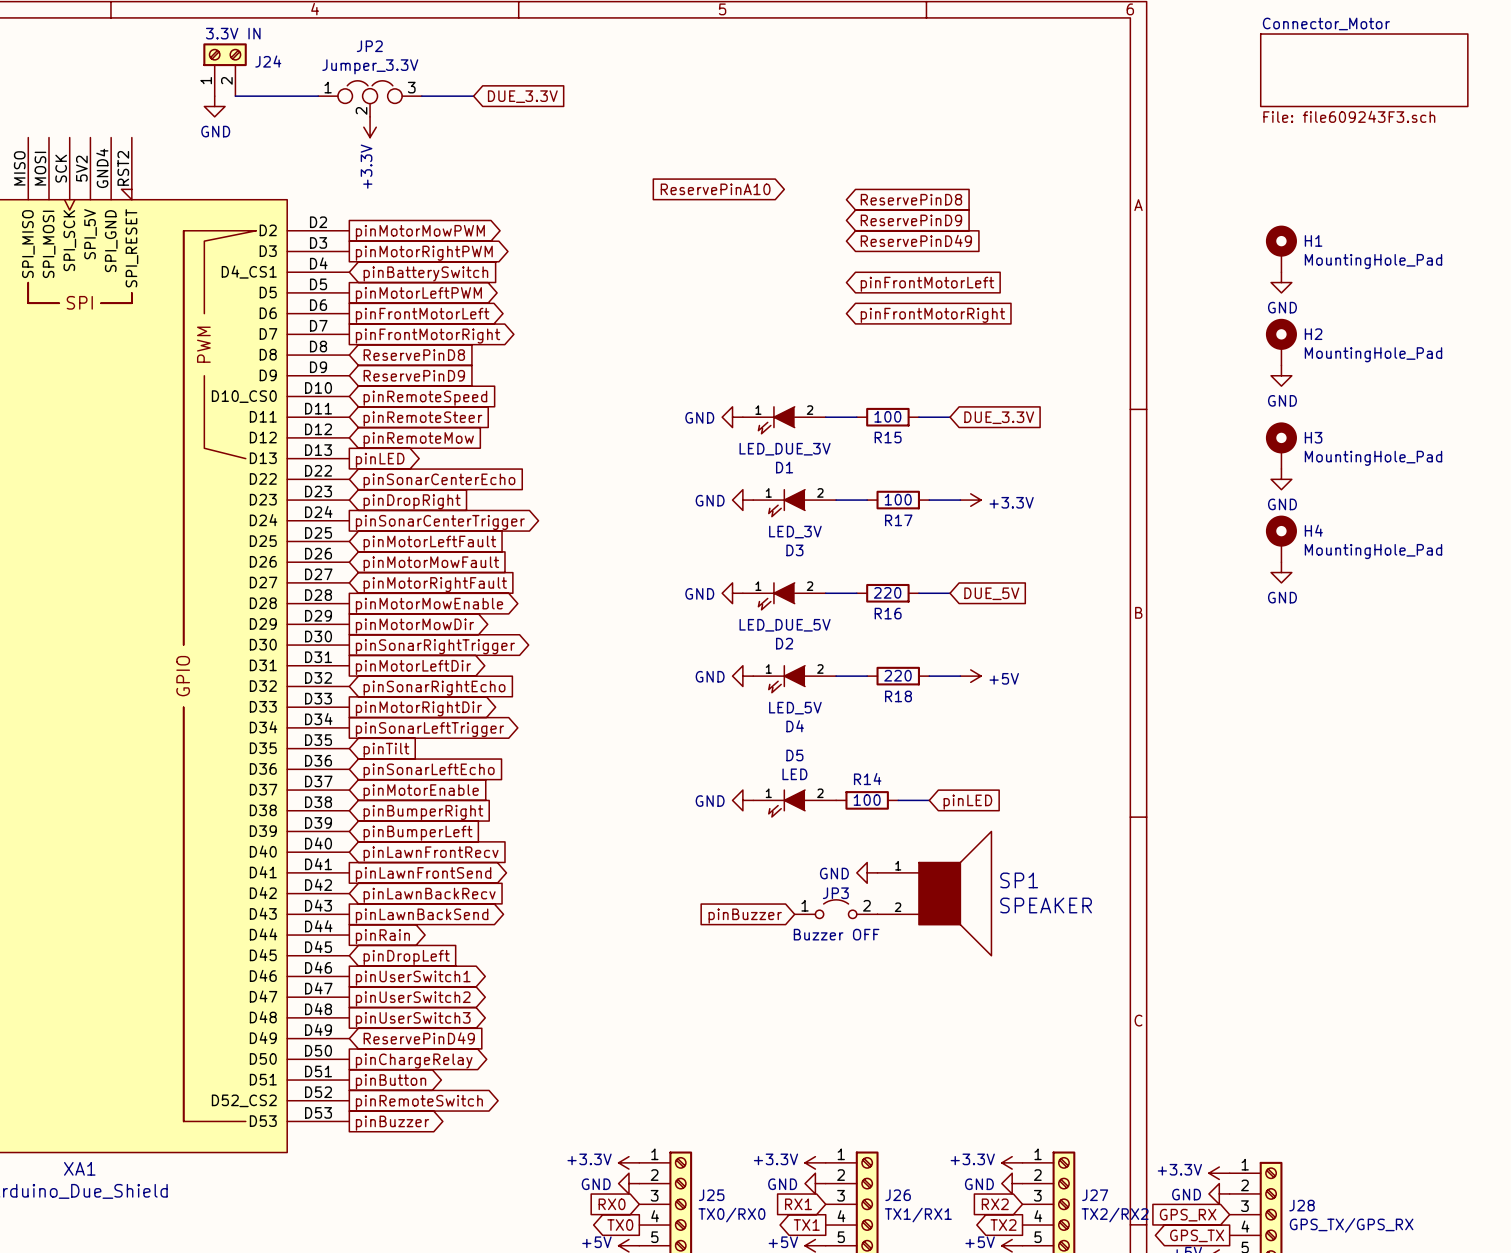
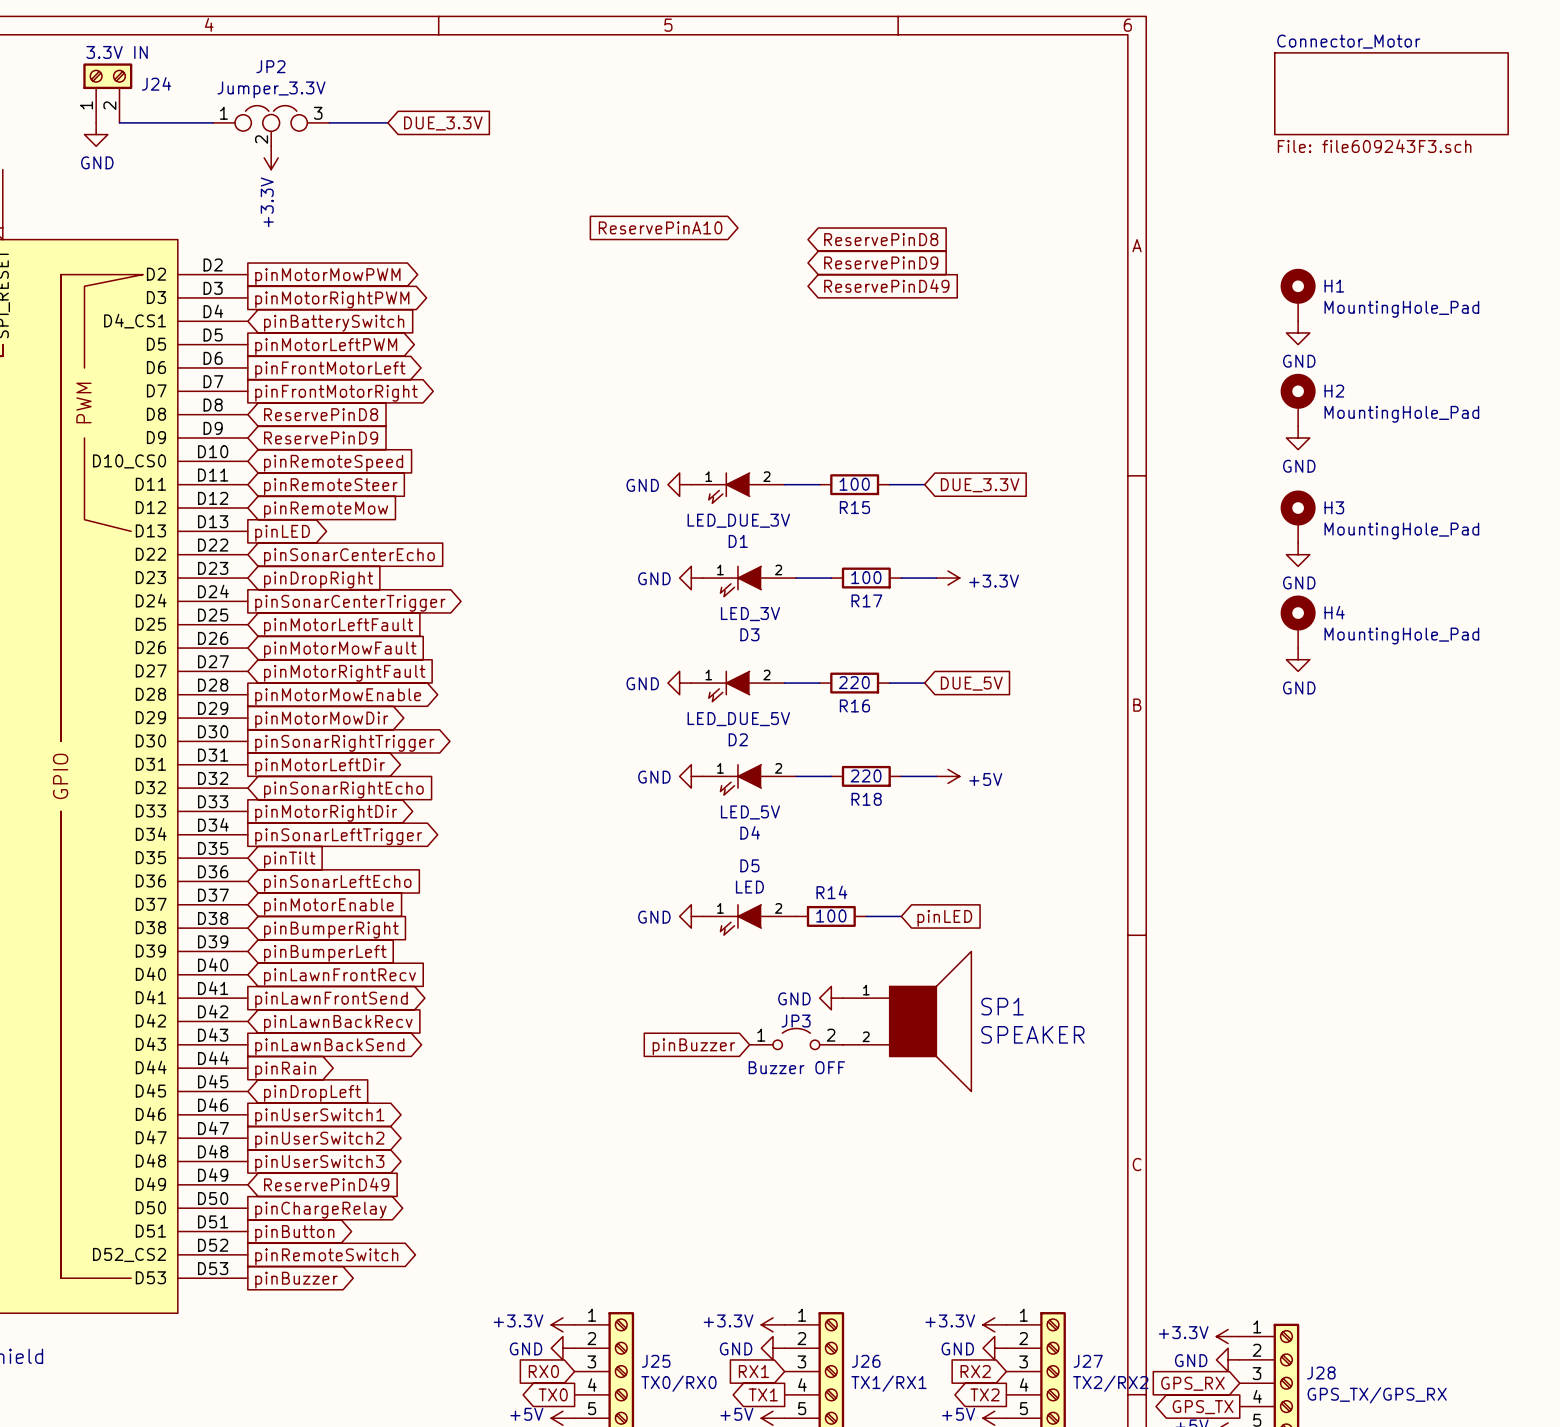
global label: pinFrontMotorLeft (927, 284) -> none
global label: pinFrontMotorRight (932, 315) -> none

